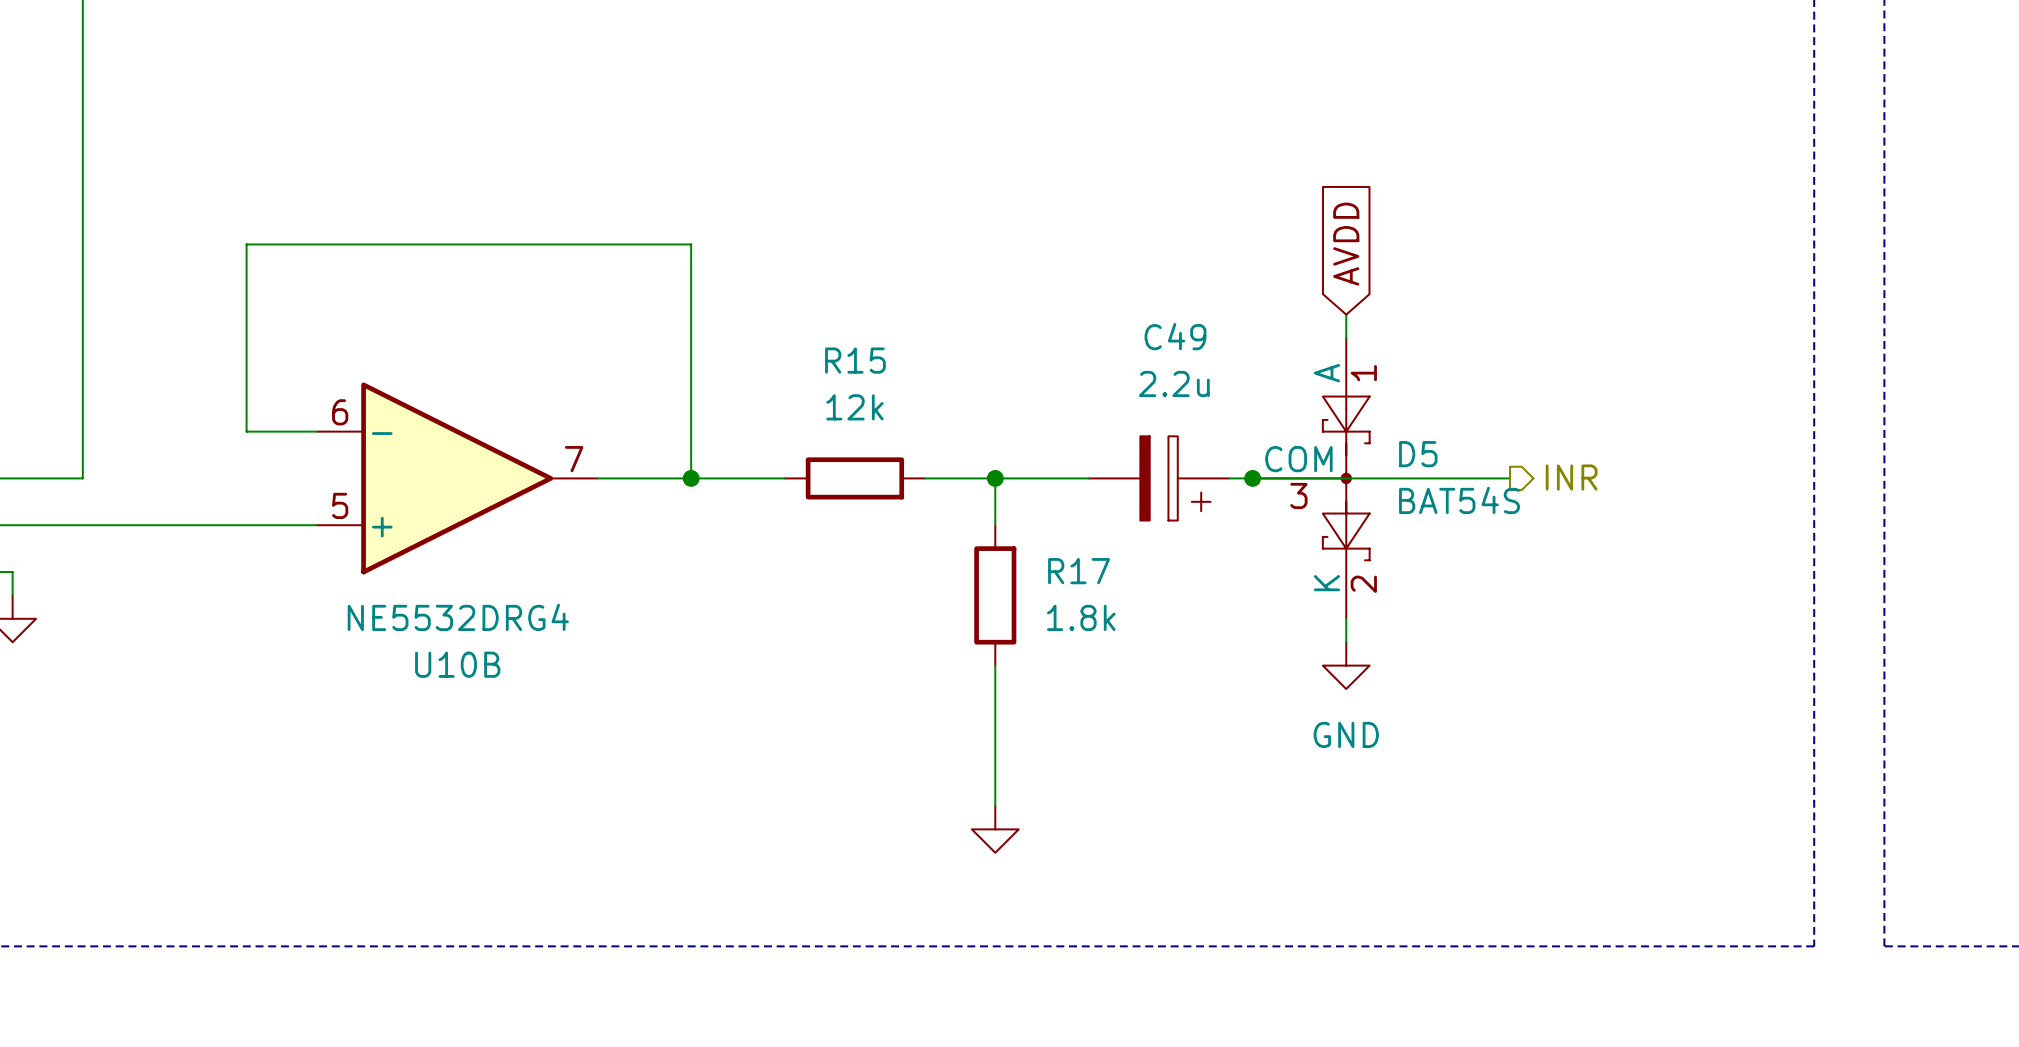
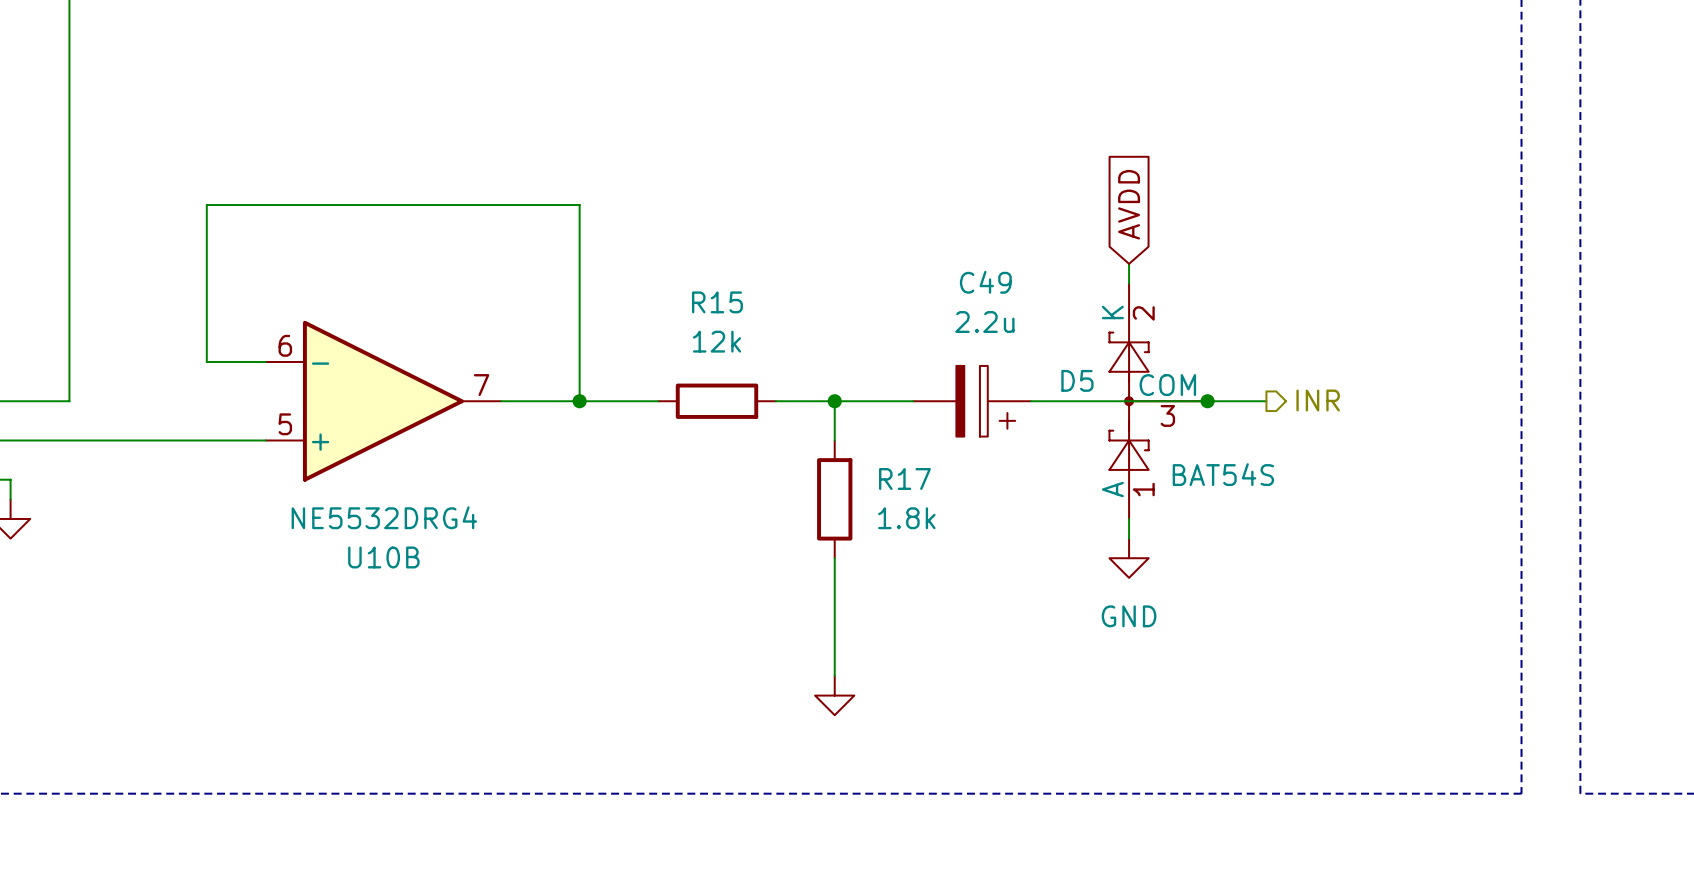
D5 name position: D5 (1418, 454) -> D5 (1077, 380)
junction: (1252, 478) -> none
D5 rotation: 0° (1346, 478) -> 180° (1129, 401)
junction: none -> (1207, 401)
D5 value position: BAT54S (1459, 500) -> BAT54S (1223, 474)

